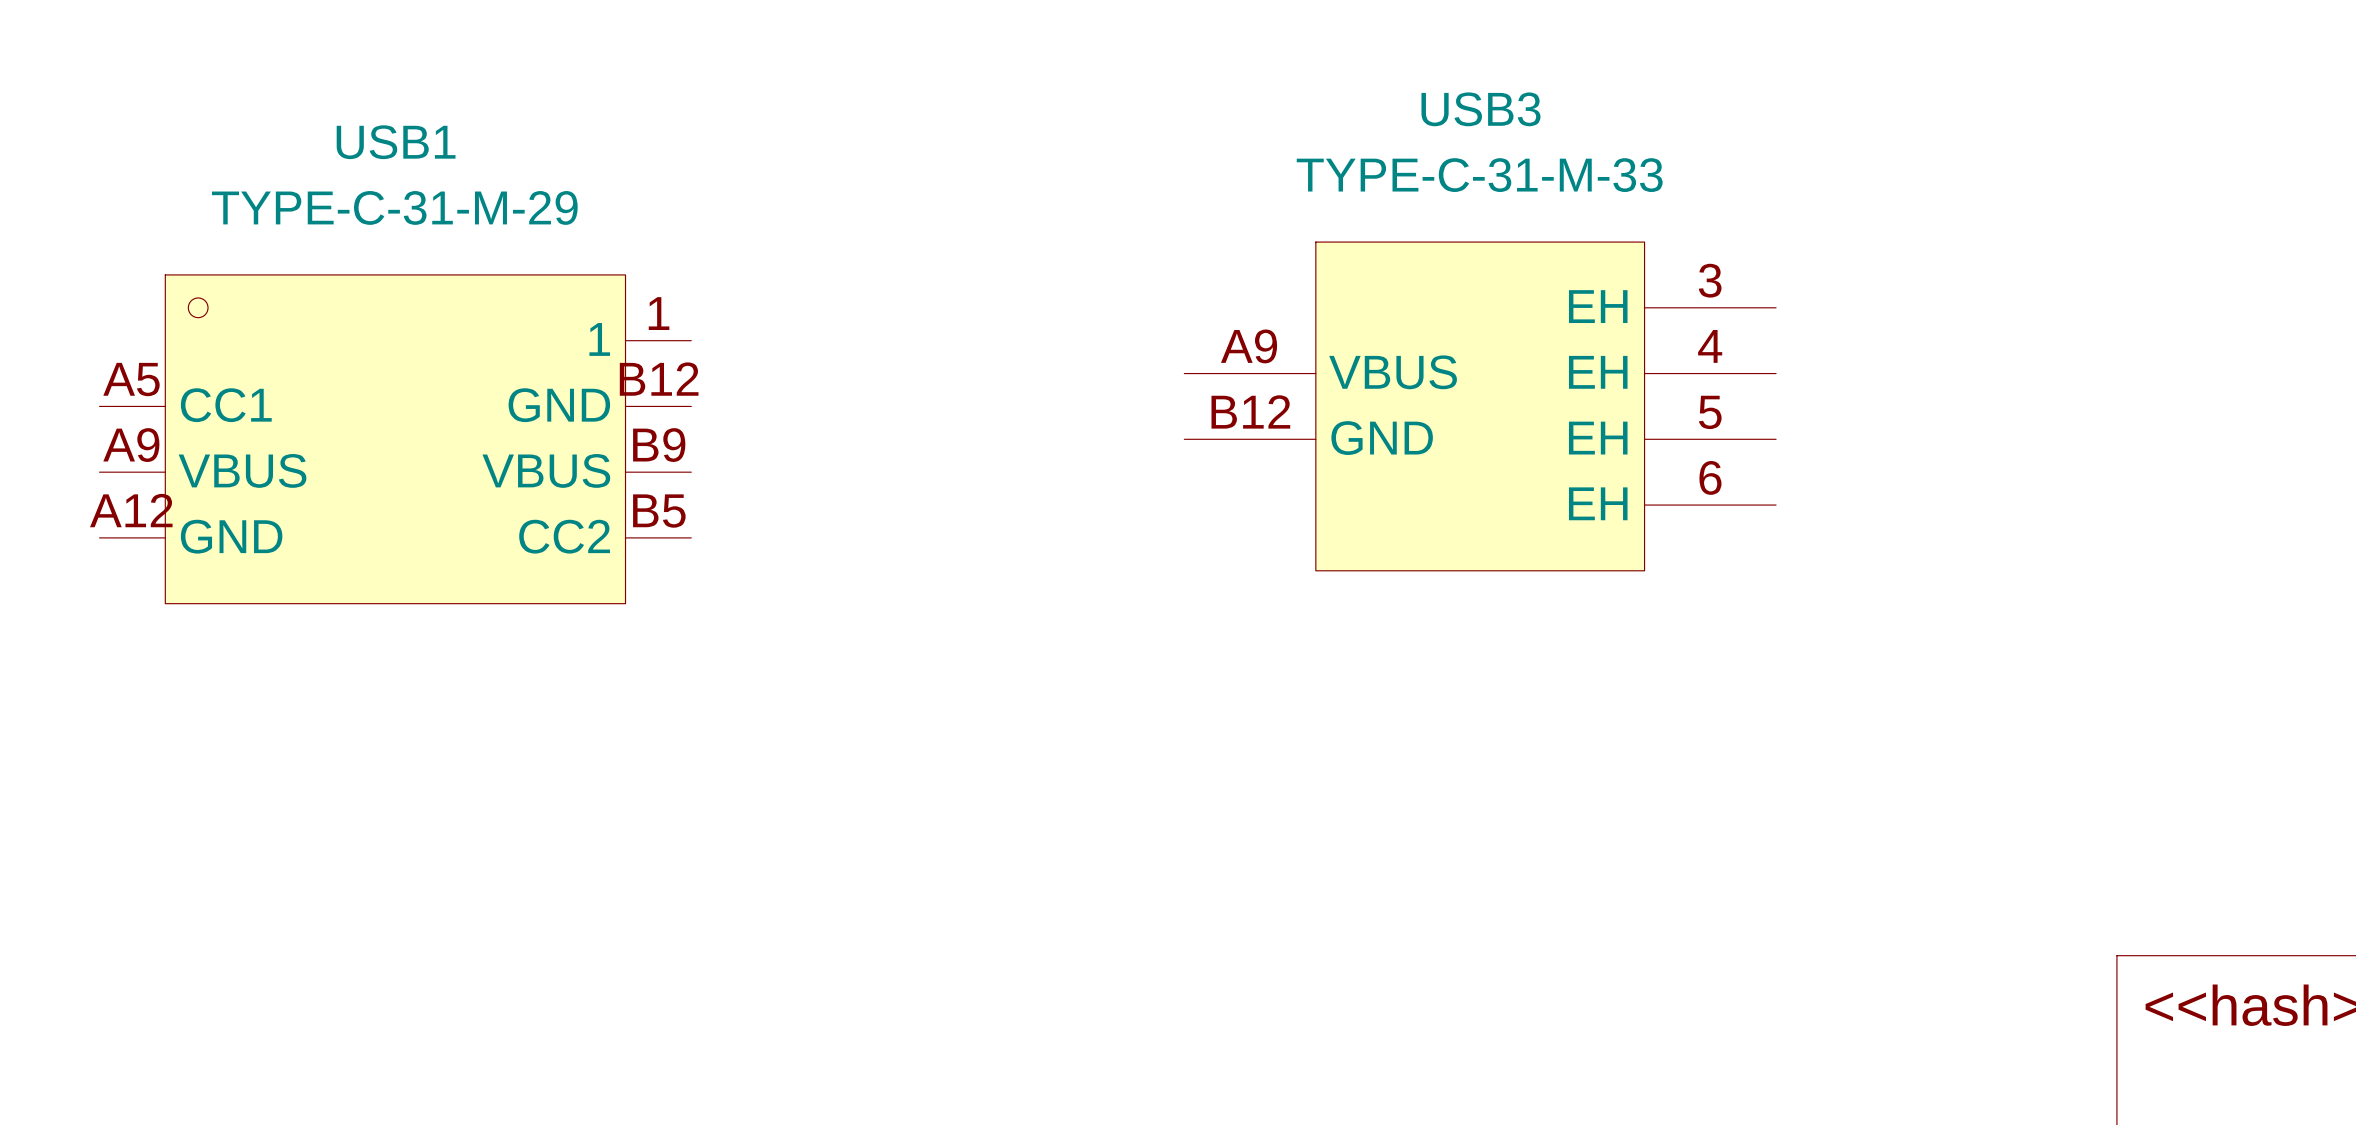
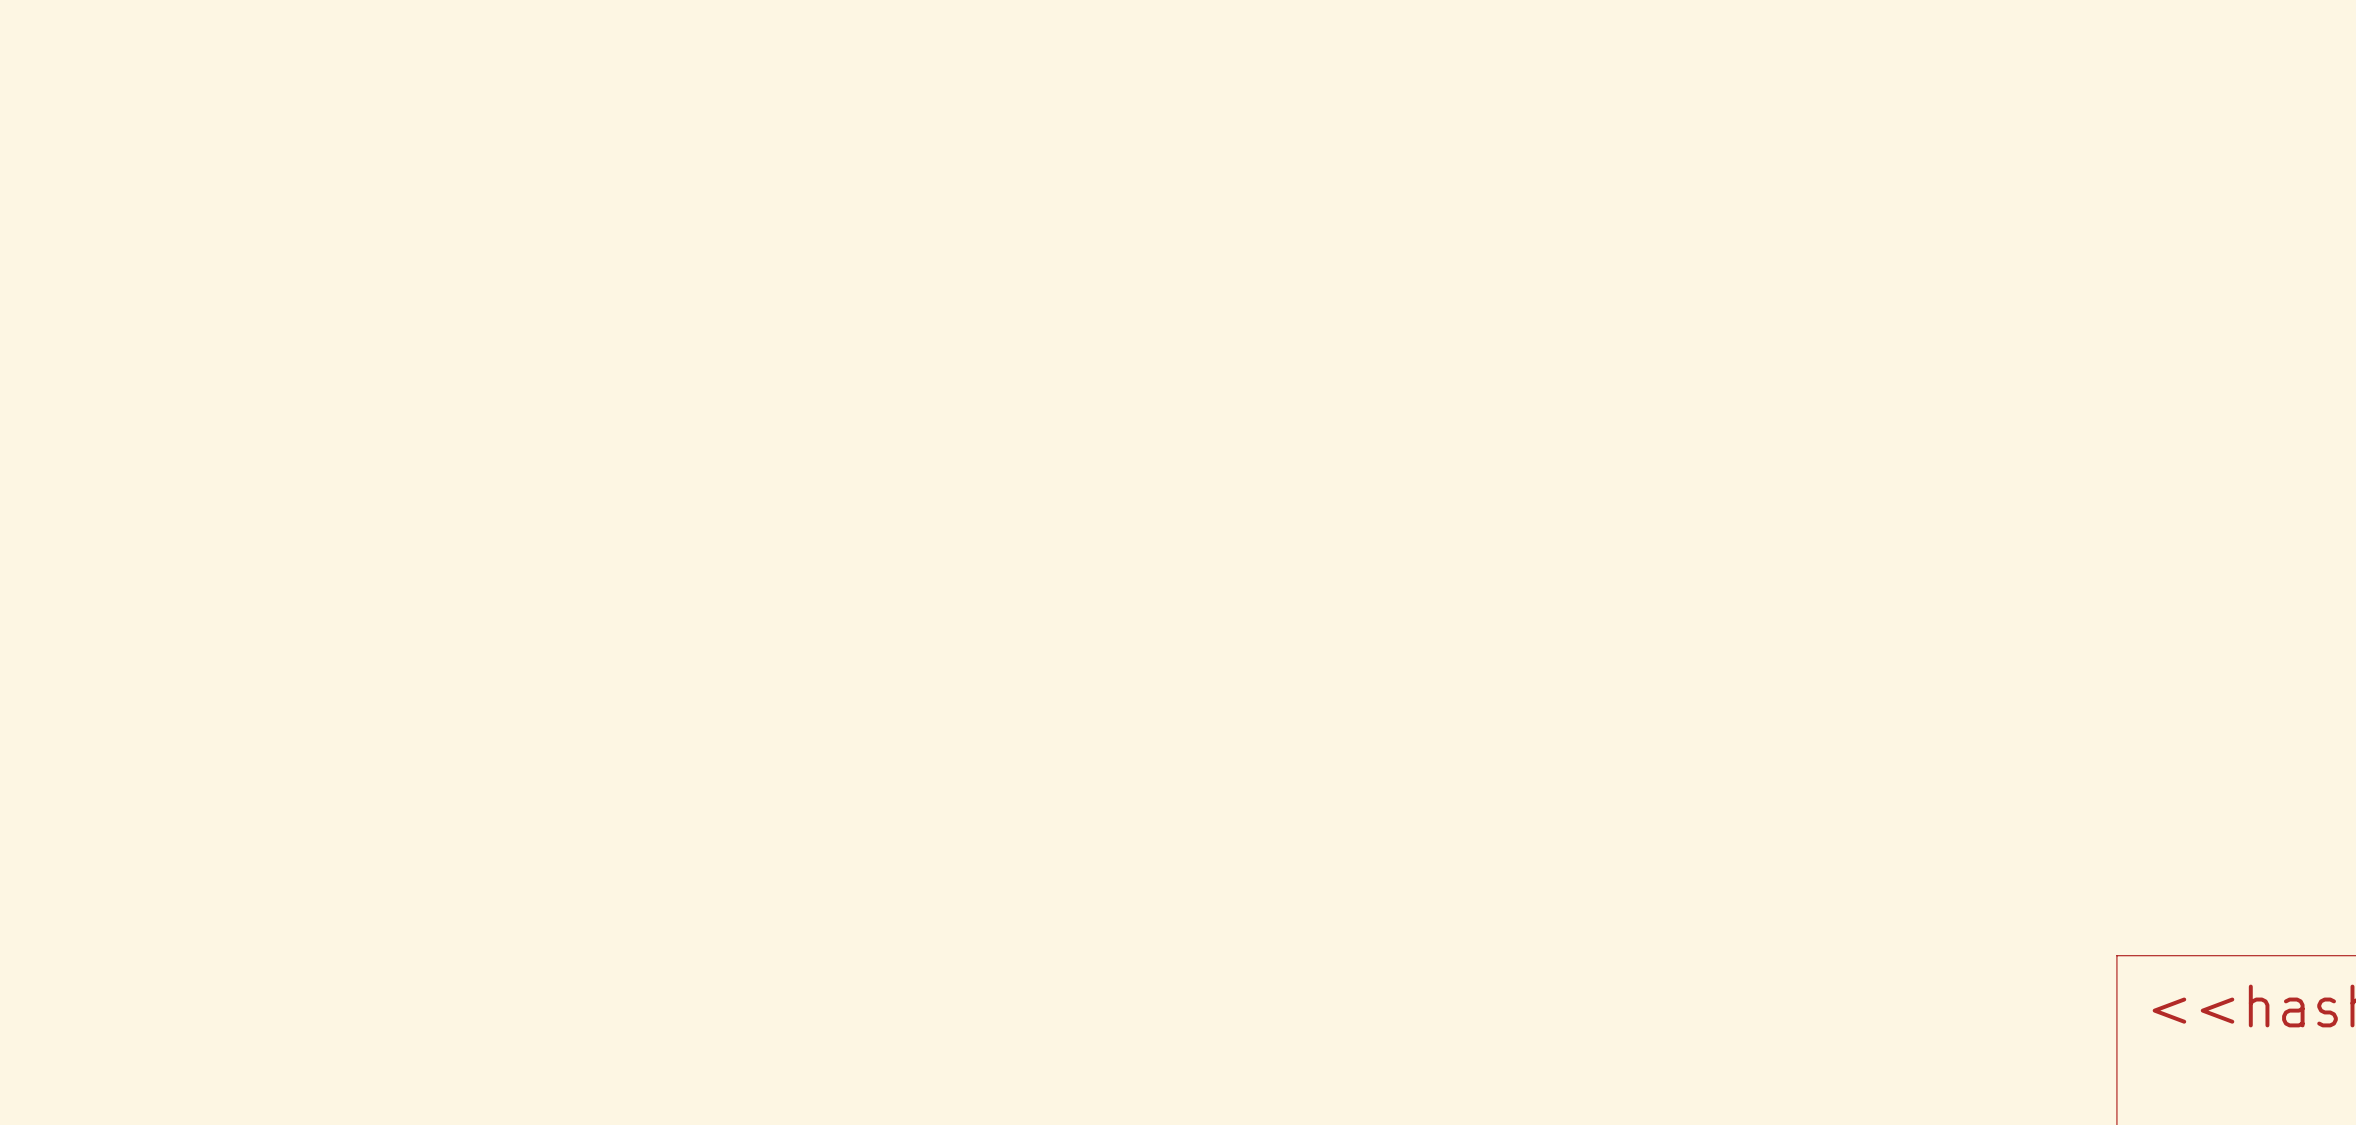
USB3: TYPE-C-31-M-33 (1480, 406) -> none
USB1: TYPE-C-31-M-29 (395, 439) -> none

